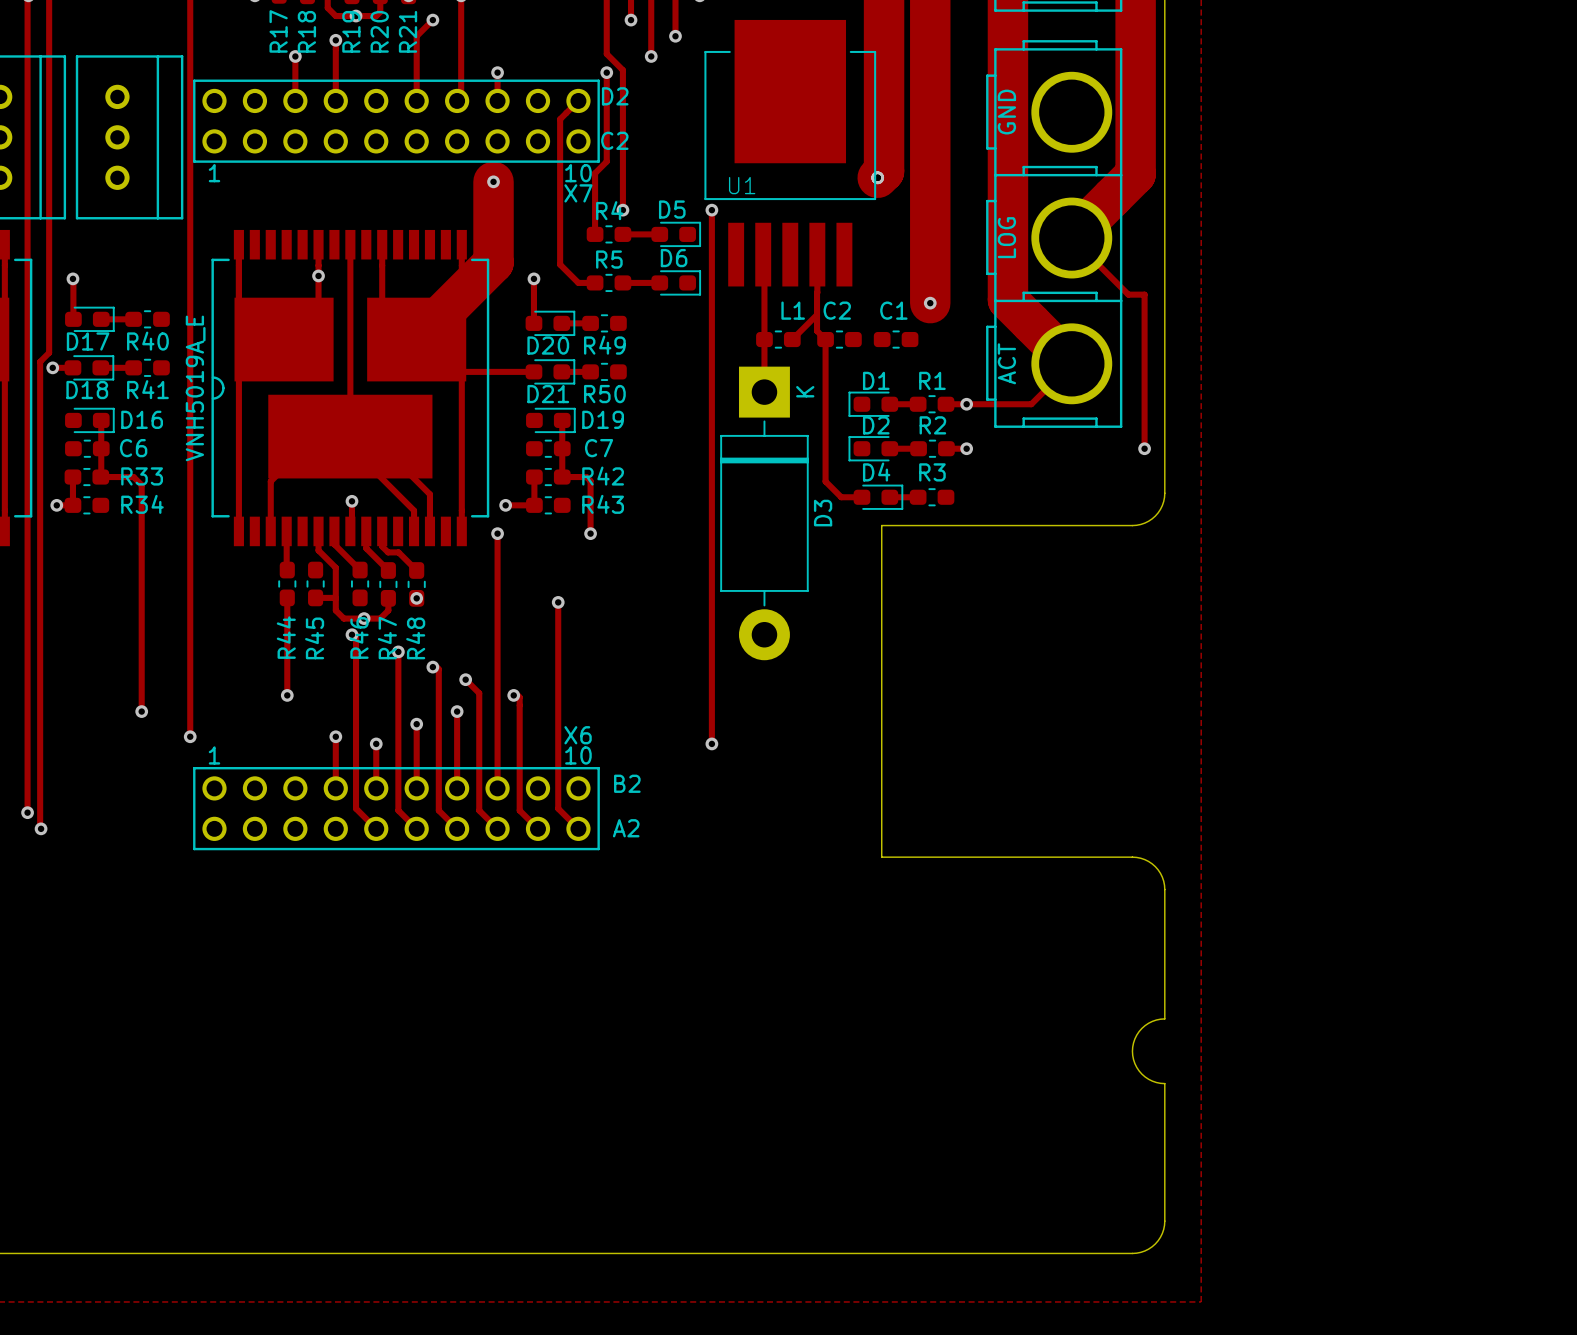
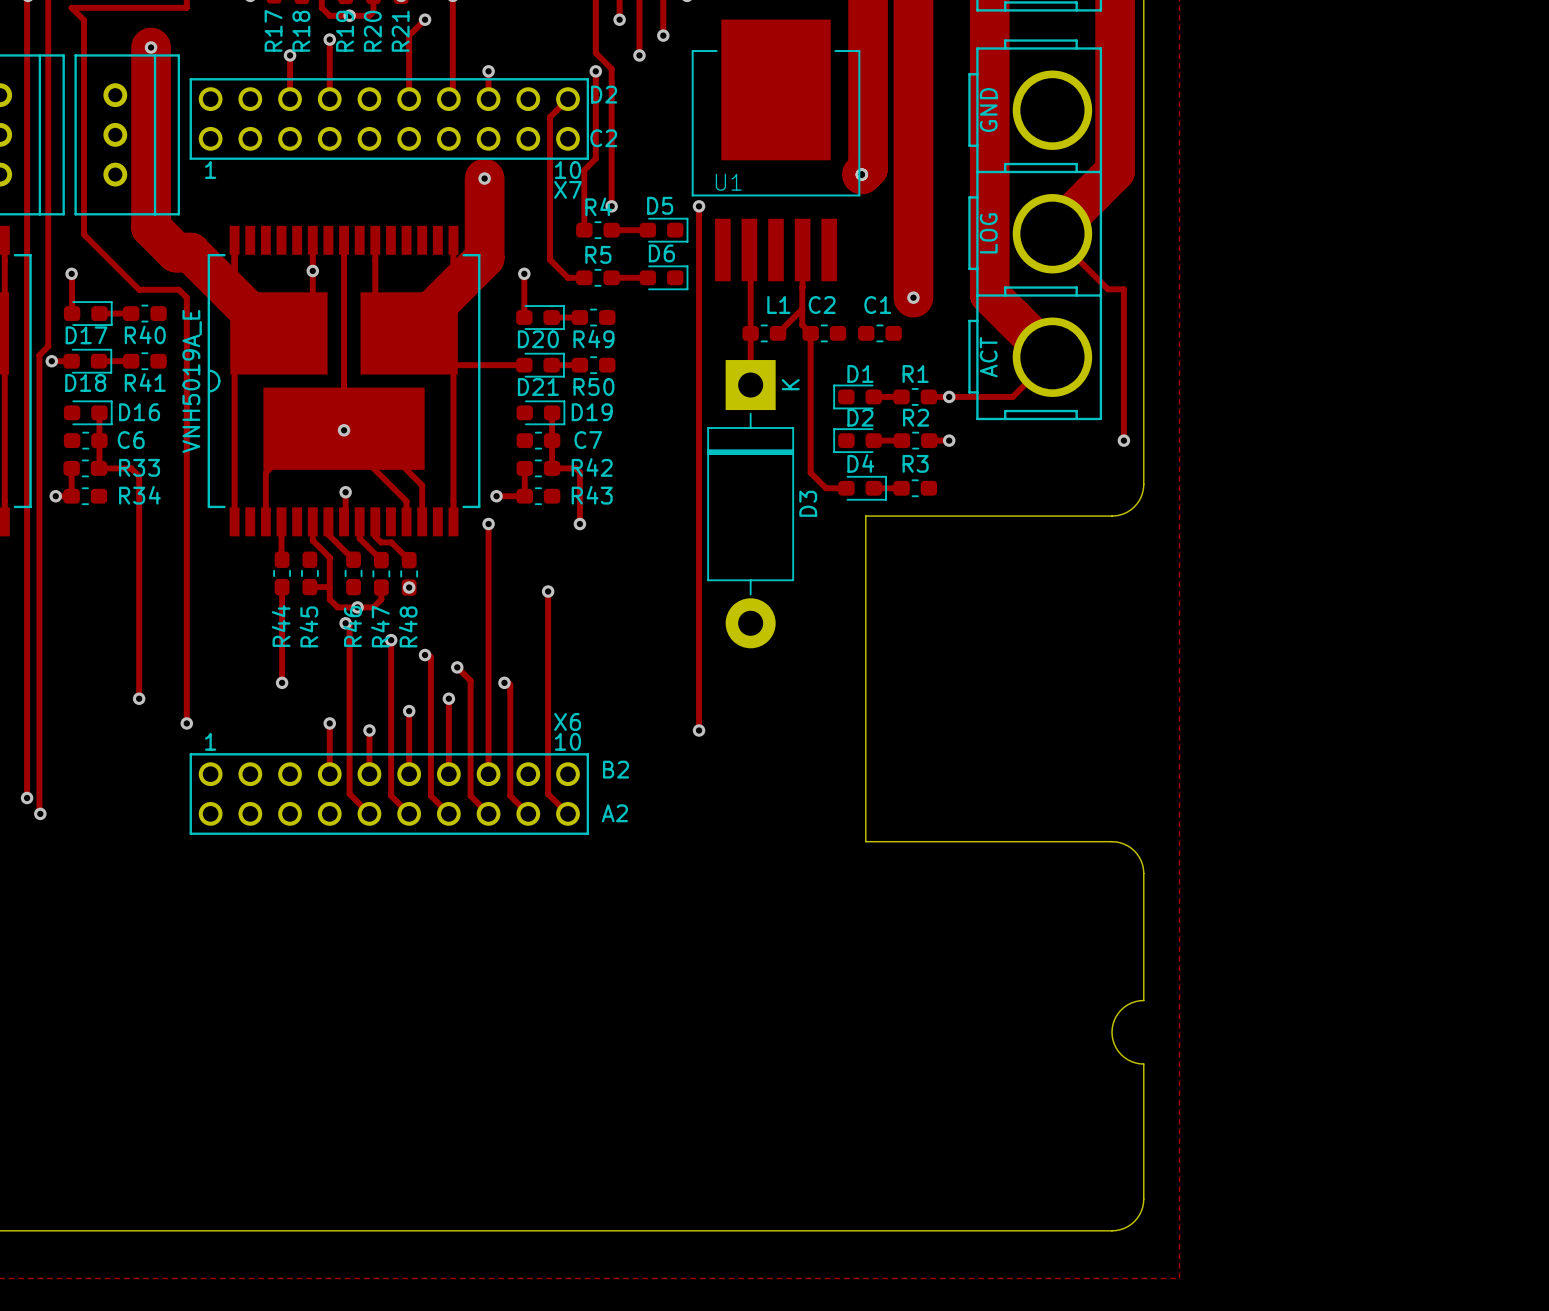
track: (190, 7) (190, 303) -> (186, 7) (71, 7) (84, 20) (84, 234) (139, 289) (178, 289) (186, 297)
track: none -> (151, 47) (151, 227) (176, 252) (190, 252) (271, 333)
via: none -> (151, 47)
via: none -> (344, 430)

